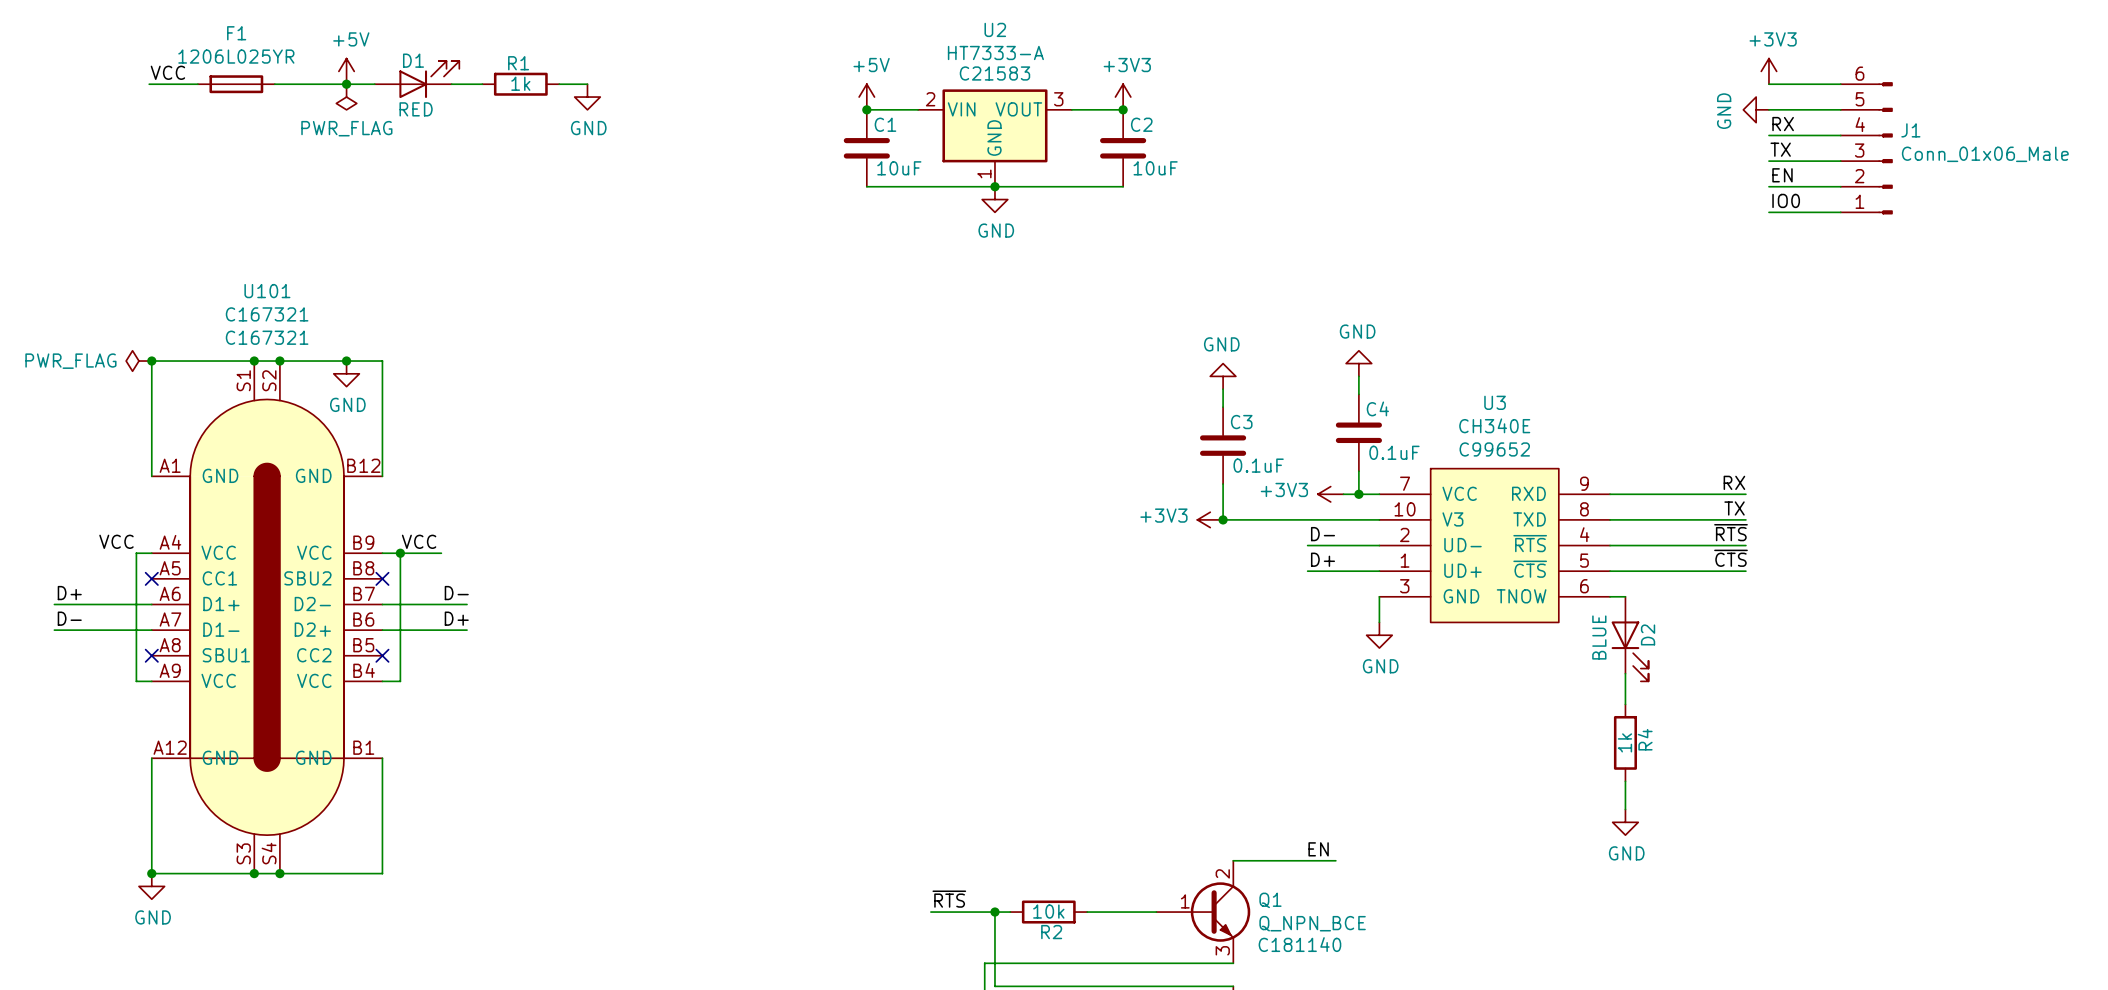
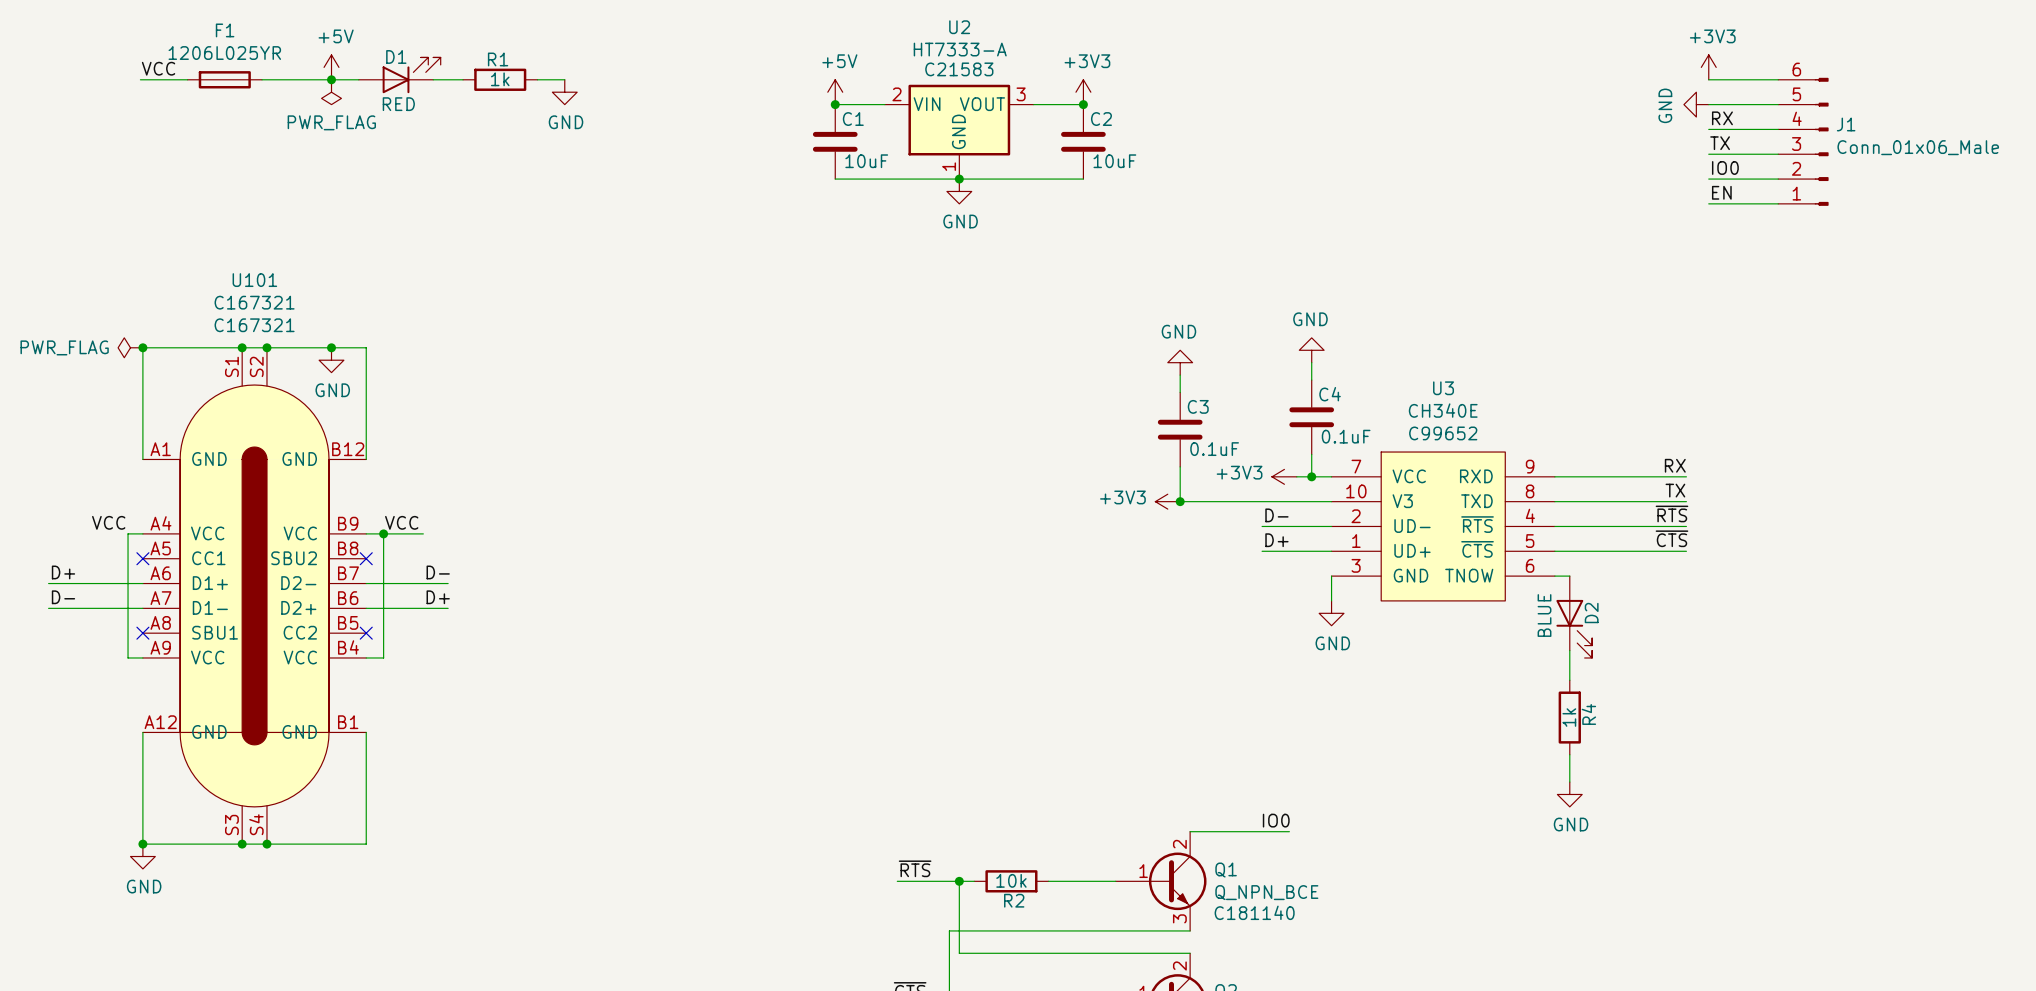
label: EN (1782, 175) -> IO0 (1725, 167)
label: IO0 (1786, 200) -> EN (1721, 192)
label: EN (1318, 849) -> IO0 (1276, 820)

